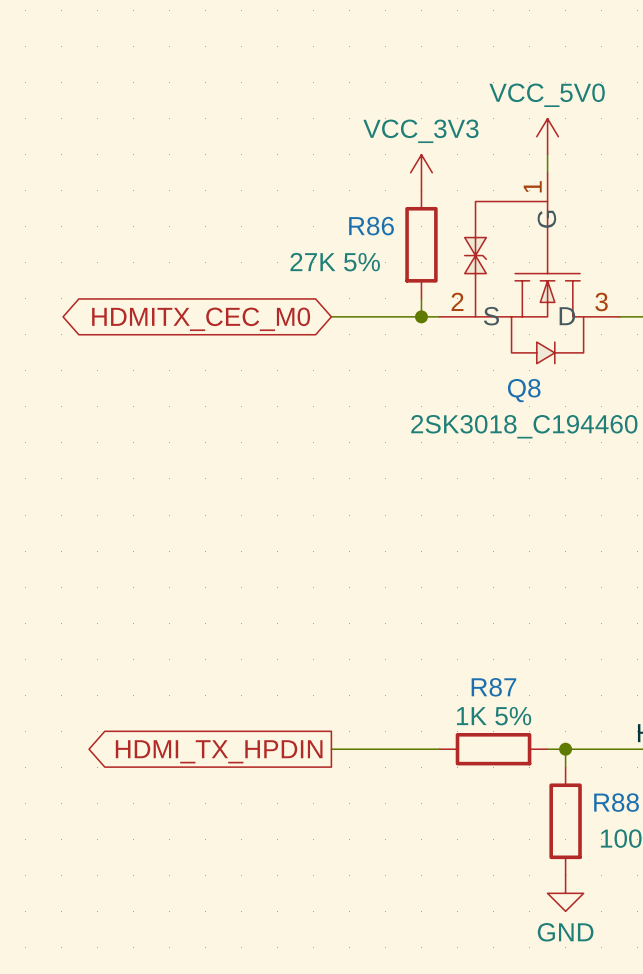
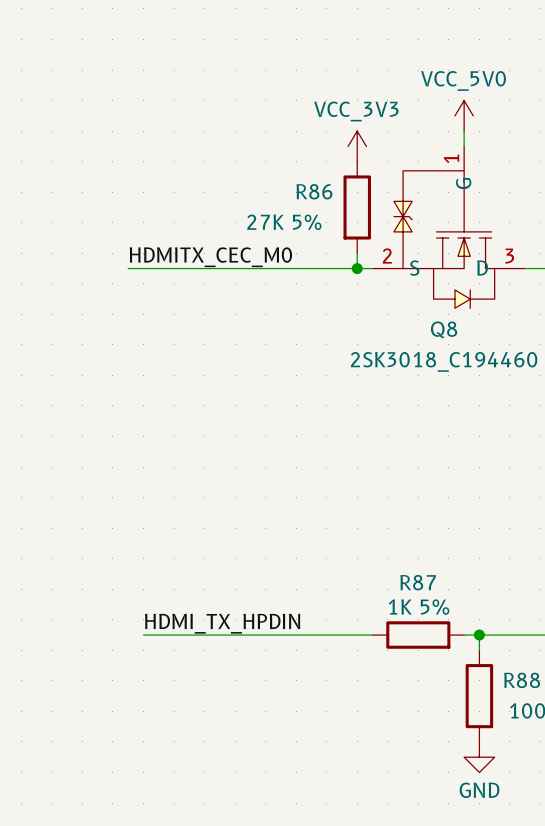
label: none -> HDMITX_CEC_M0 (210, 257)
wire: none -> (128, 268) (280, 268)
global label: HDMITX_CEC_M0 (201, 319) -> none
label: none -> HDMI_TX_HPDIN (222, 623)
wire: none -> (143, 635) (280, 635)
global label: HDMI_TX_HPDIN (219, 751) -> none

